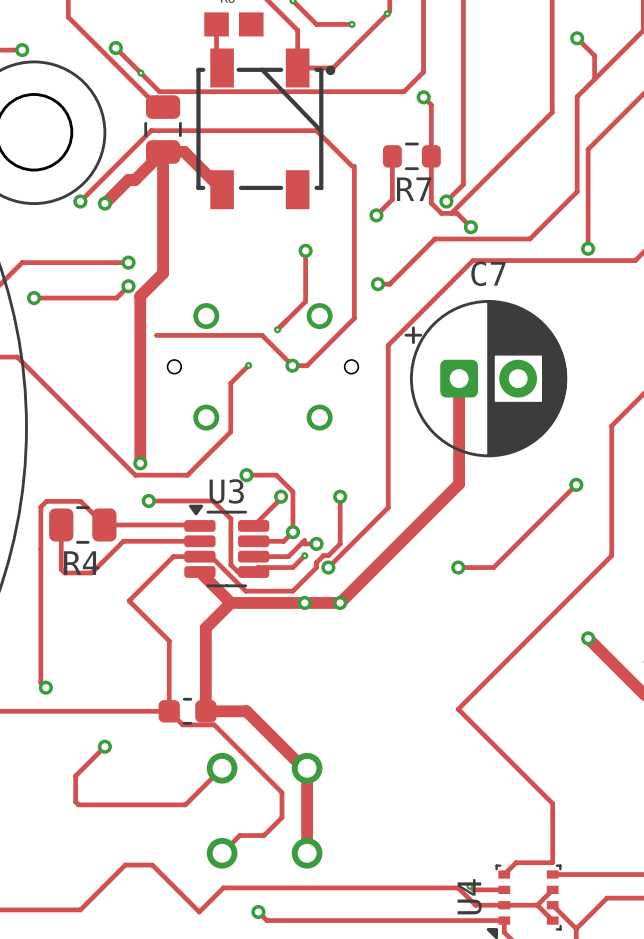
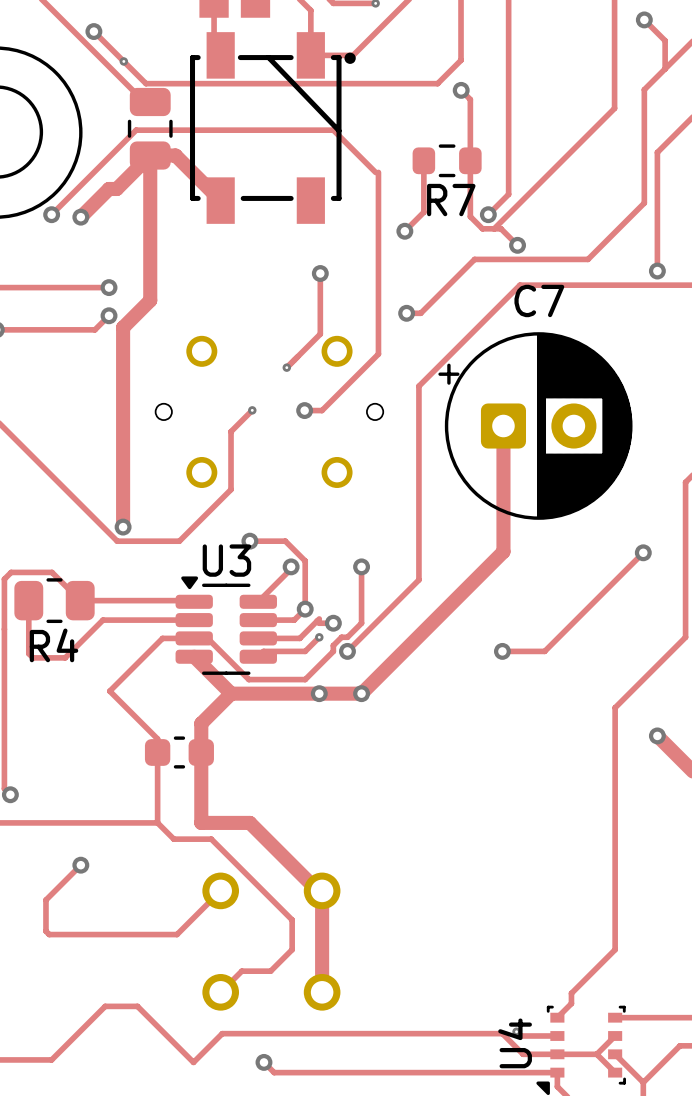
track: (156, 335) (262, 335) (292, 365) -> none
track: (148, 500) (213, 500) (230, 518) (230, 564) (237, 572) (253, 572) -> none
via: (148, 500) -> none
track: (552, 614) (458, 709) (552, 803) -> (615, 707) (615, 933)
part position: (187, 711) -> (179, 752)
track: (552, 817) (552, 862) (516, 862) -> (615, 949) (571, 993) (571, 1003)

